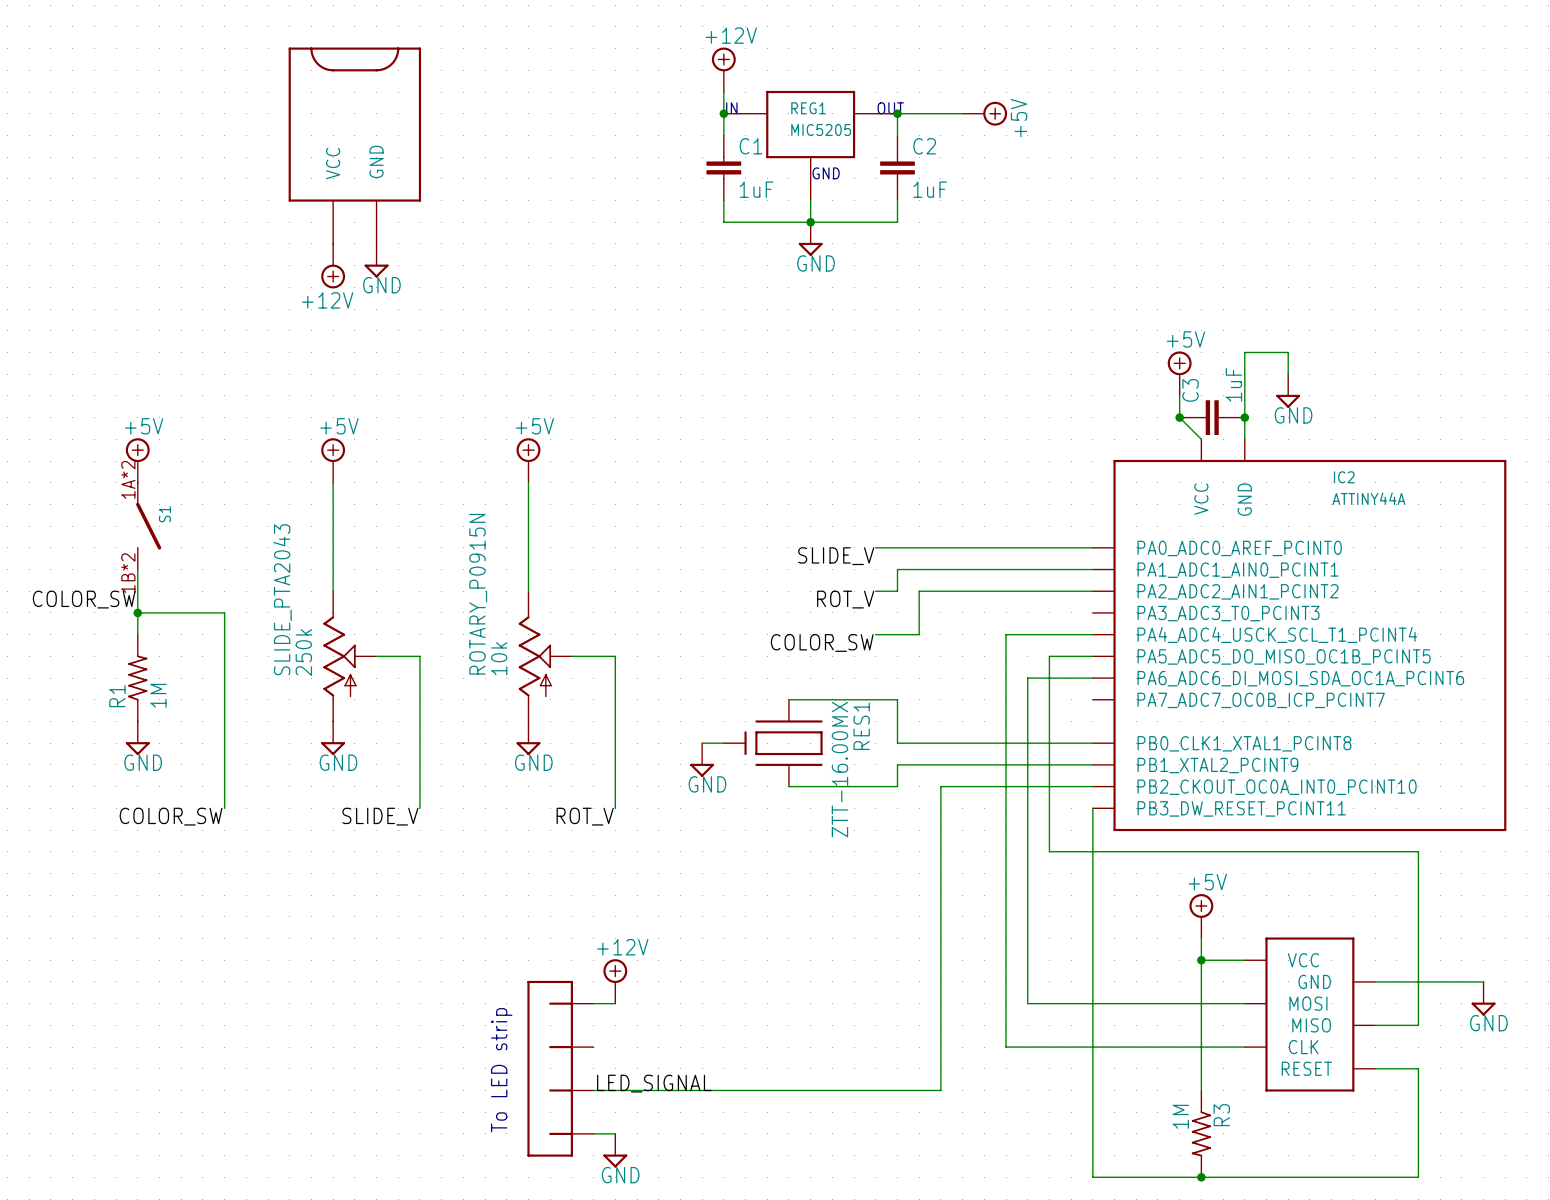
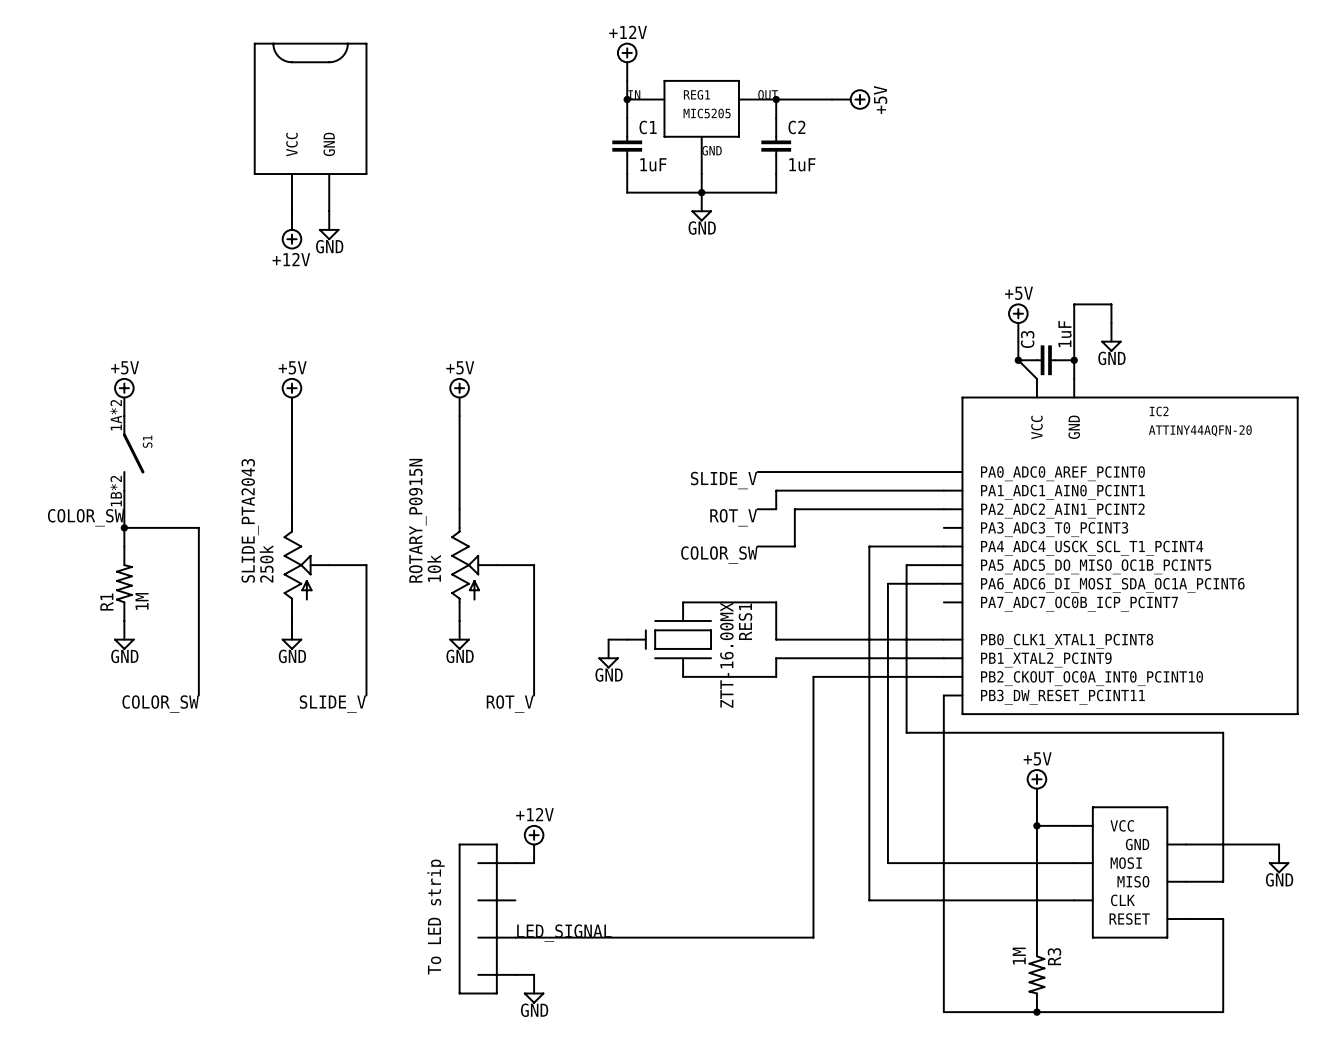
IC2 value: ATTINY44A (1368, 498) -> ATTINY44AQFN-20 (1200, 430)

